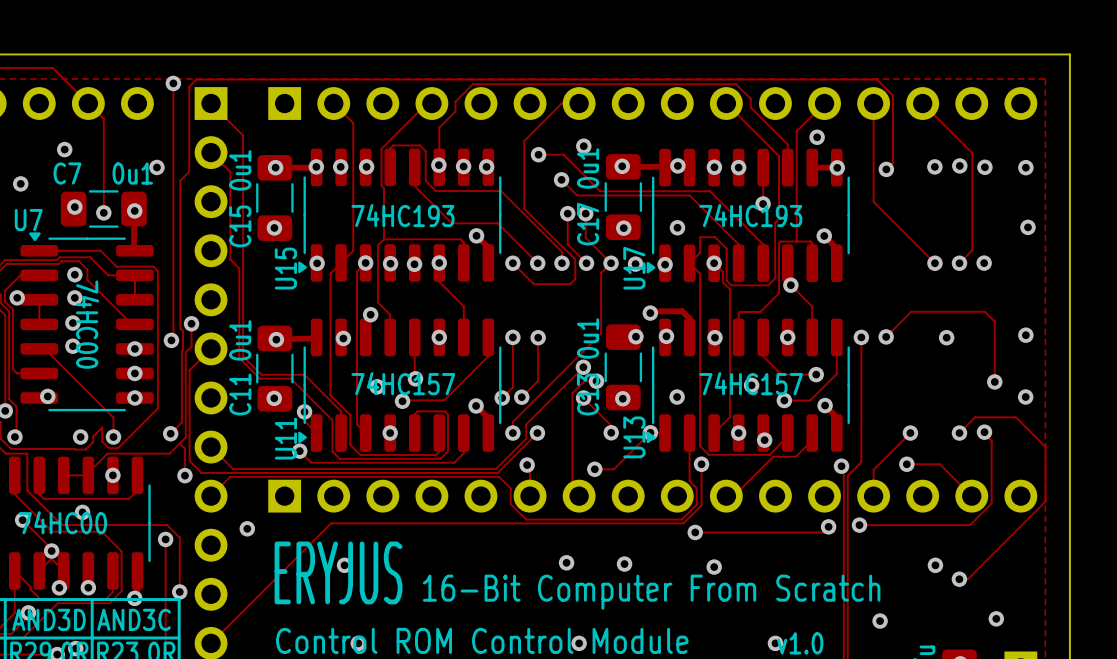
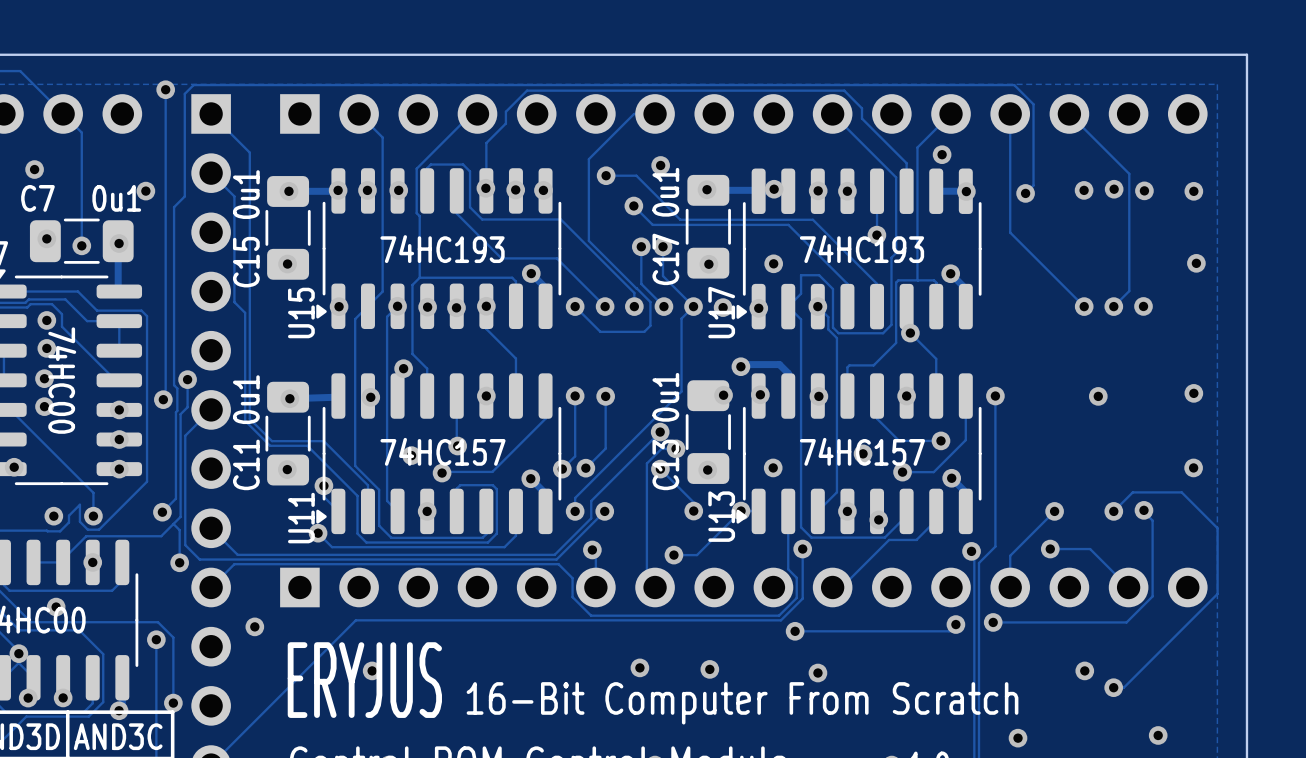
track: (886, 336) (911, 311) (984, 311) (994, 321) (994, 381) -> none
via: (886, 336) -> none
via: (994, 381) -> none

